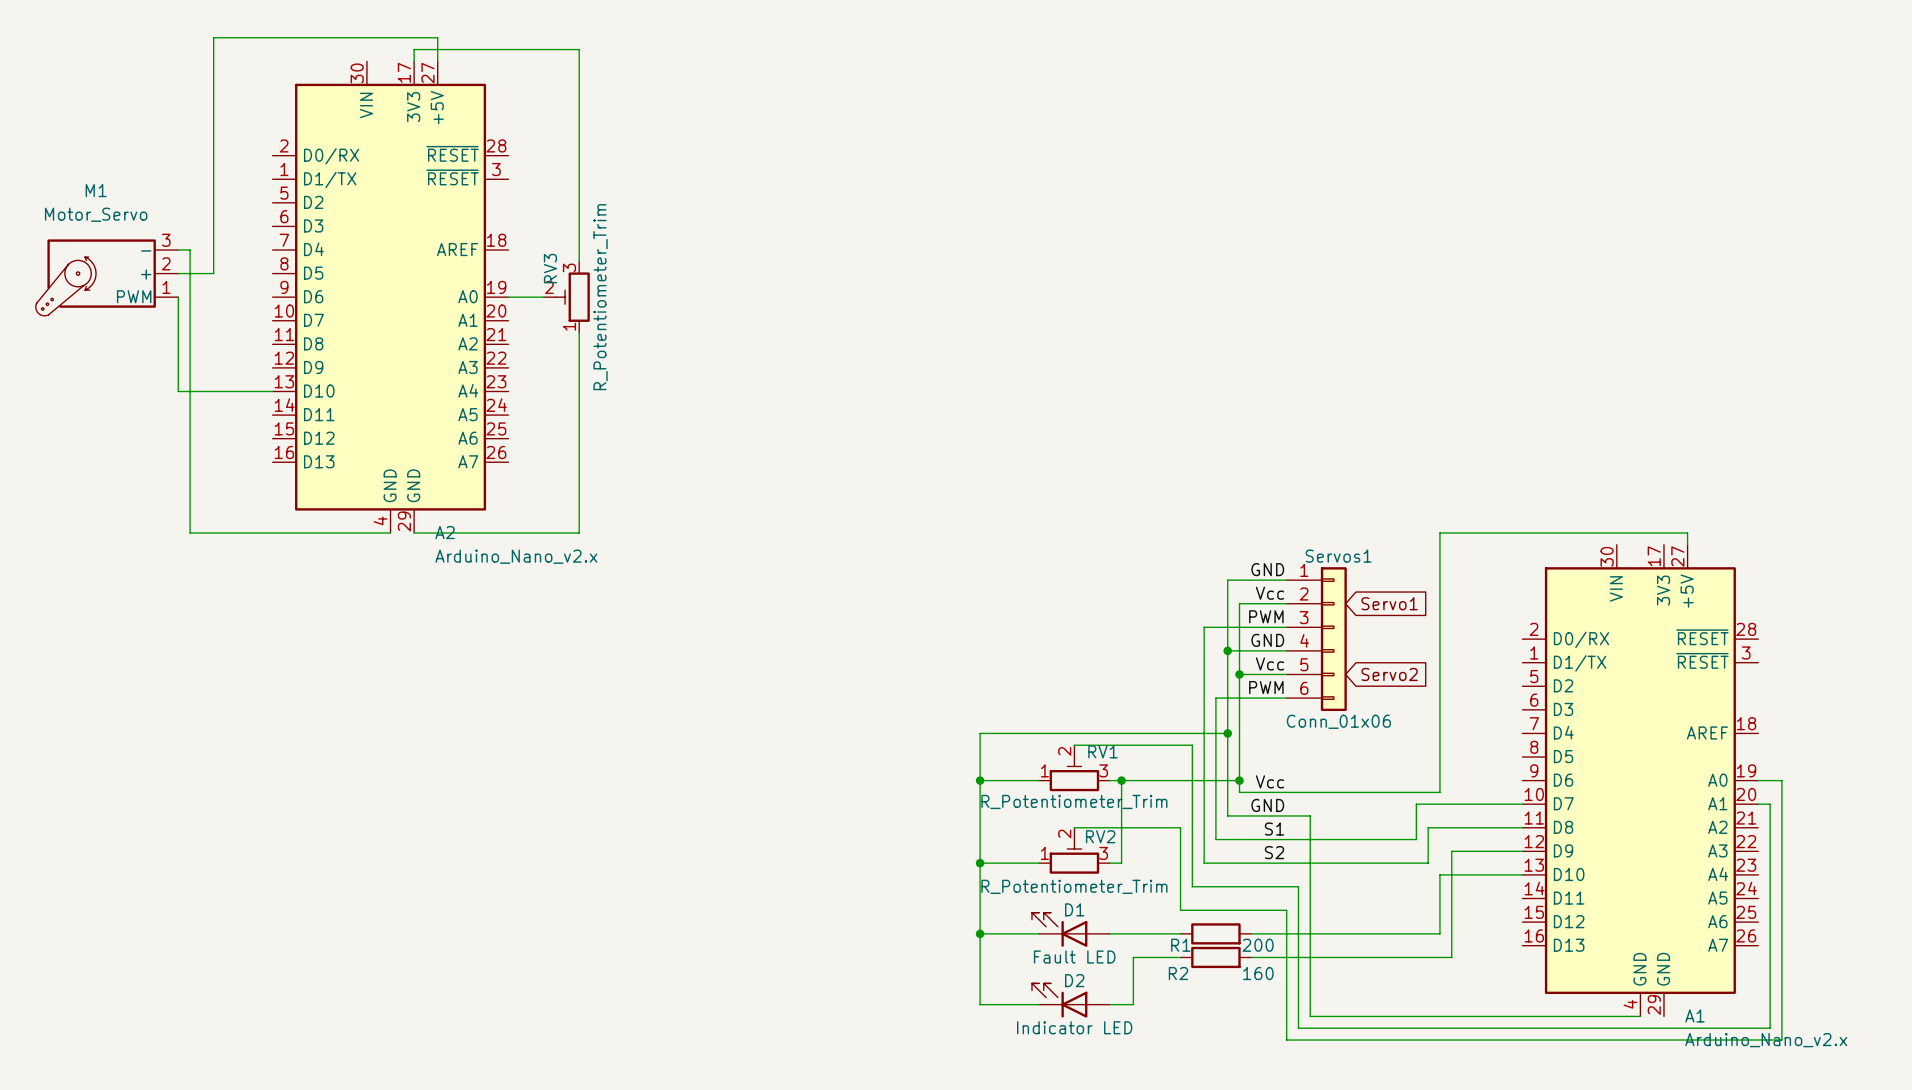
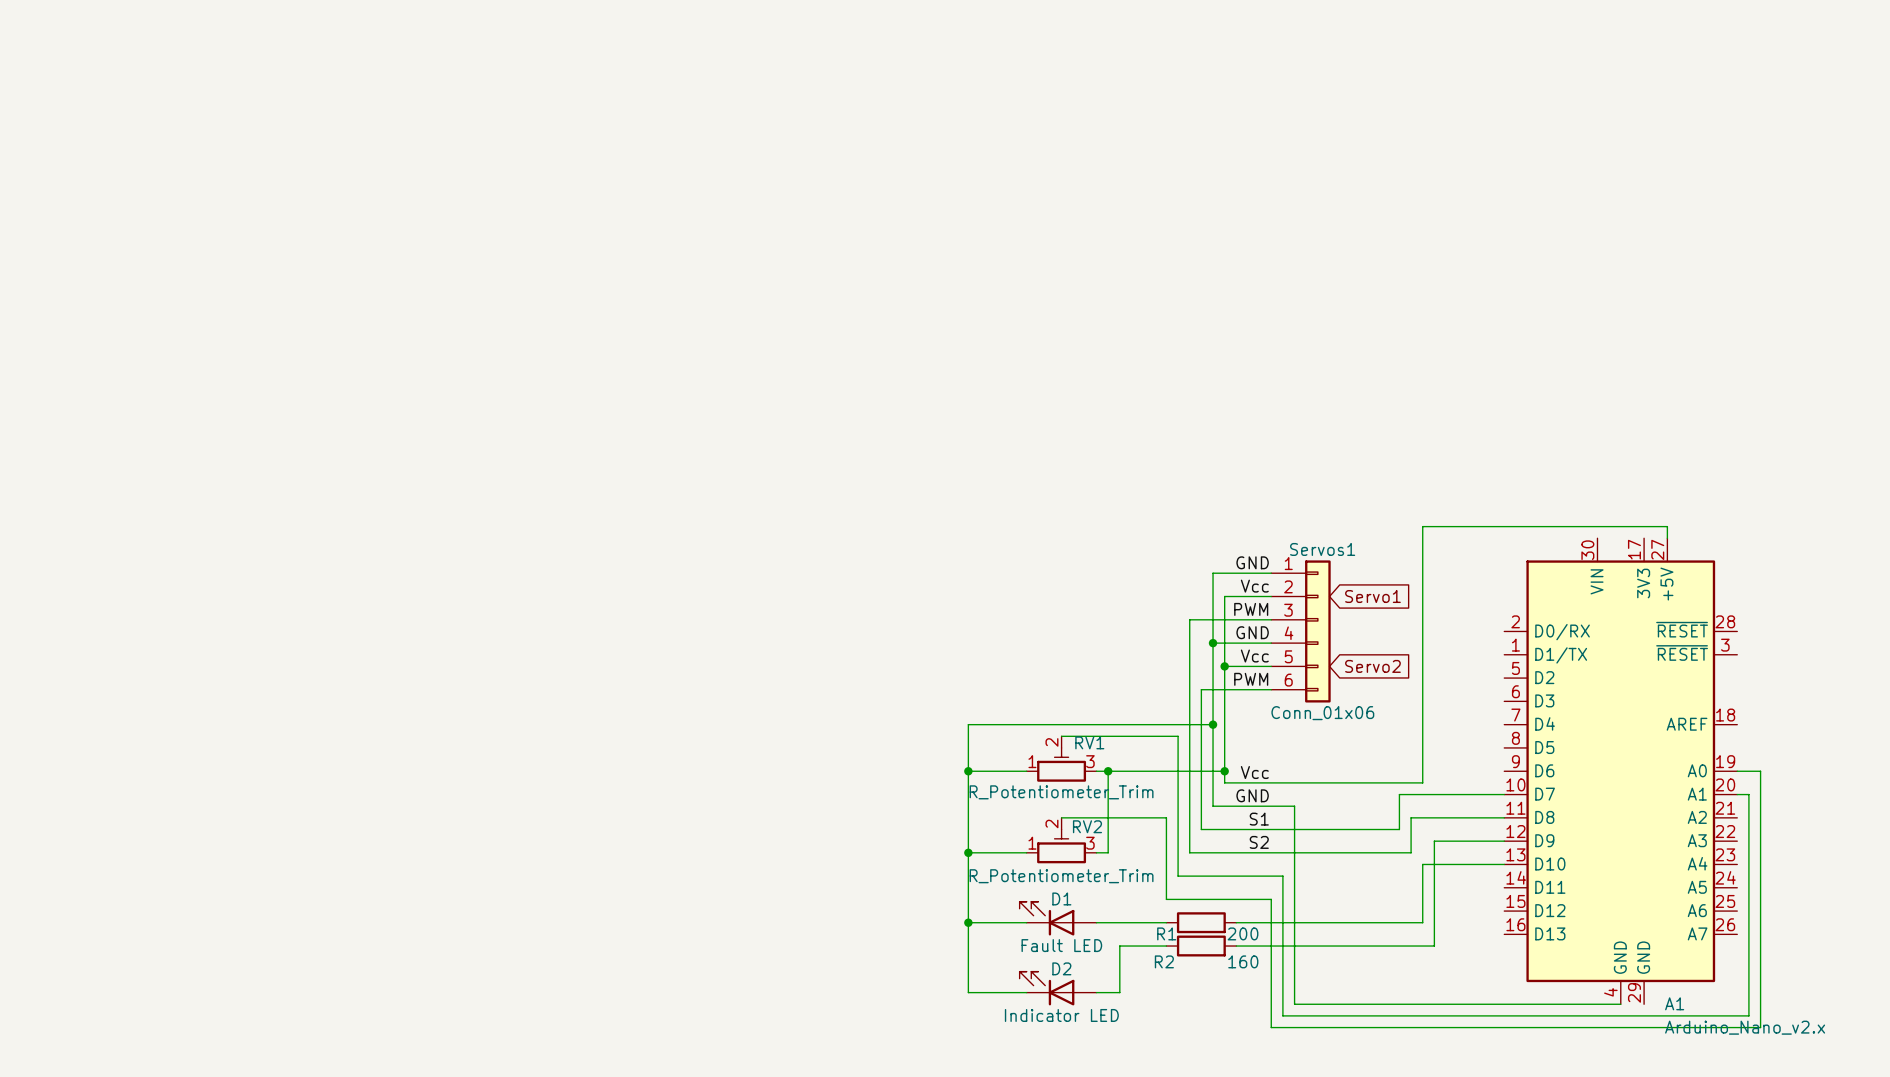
wire: (414, 61) (414, 49) (579, 49) (579, 261) -> none
wire: (437, 61) (437, 37) (213, 37) (213, 273) (178, 273) -> none
wire: (178, 249) (190, 249) (190, 532) (390, 532) -> none
M1: Motor_Servo (107, 277) -> none
wire: (178, 297) (178, 391) (272, 391) -> none
A2: Arduino_Nano_v2.x (390, 297) -> none
wire: (508, 297) (543, 297) -> none
RV3: R_Potentiometer_Trim (566, 297) -> none
wire: (579, 332) (579, 532) (414, 532) -> none

